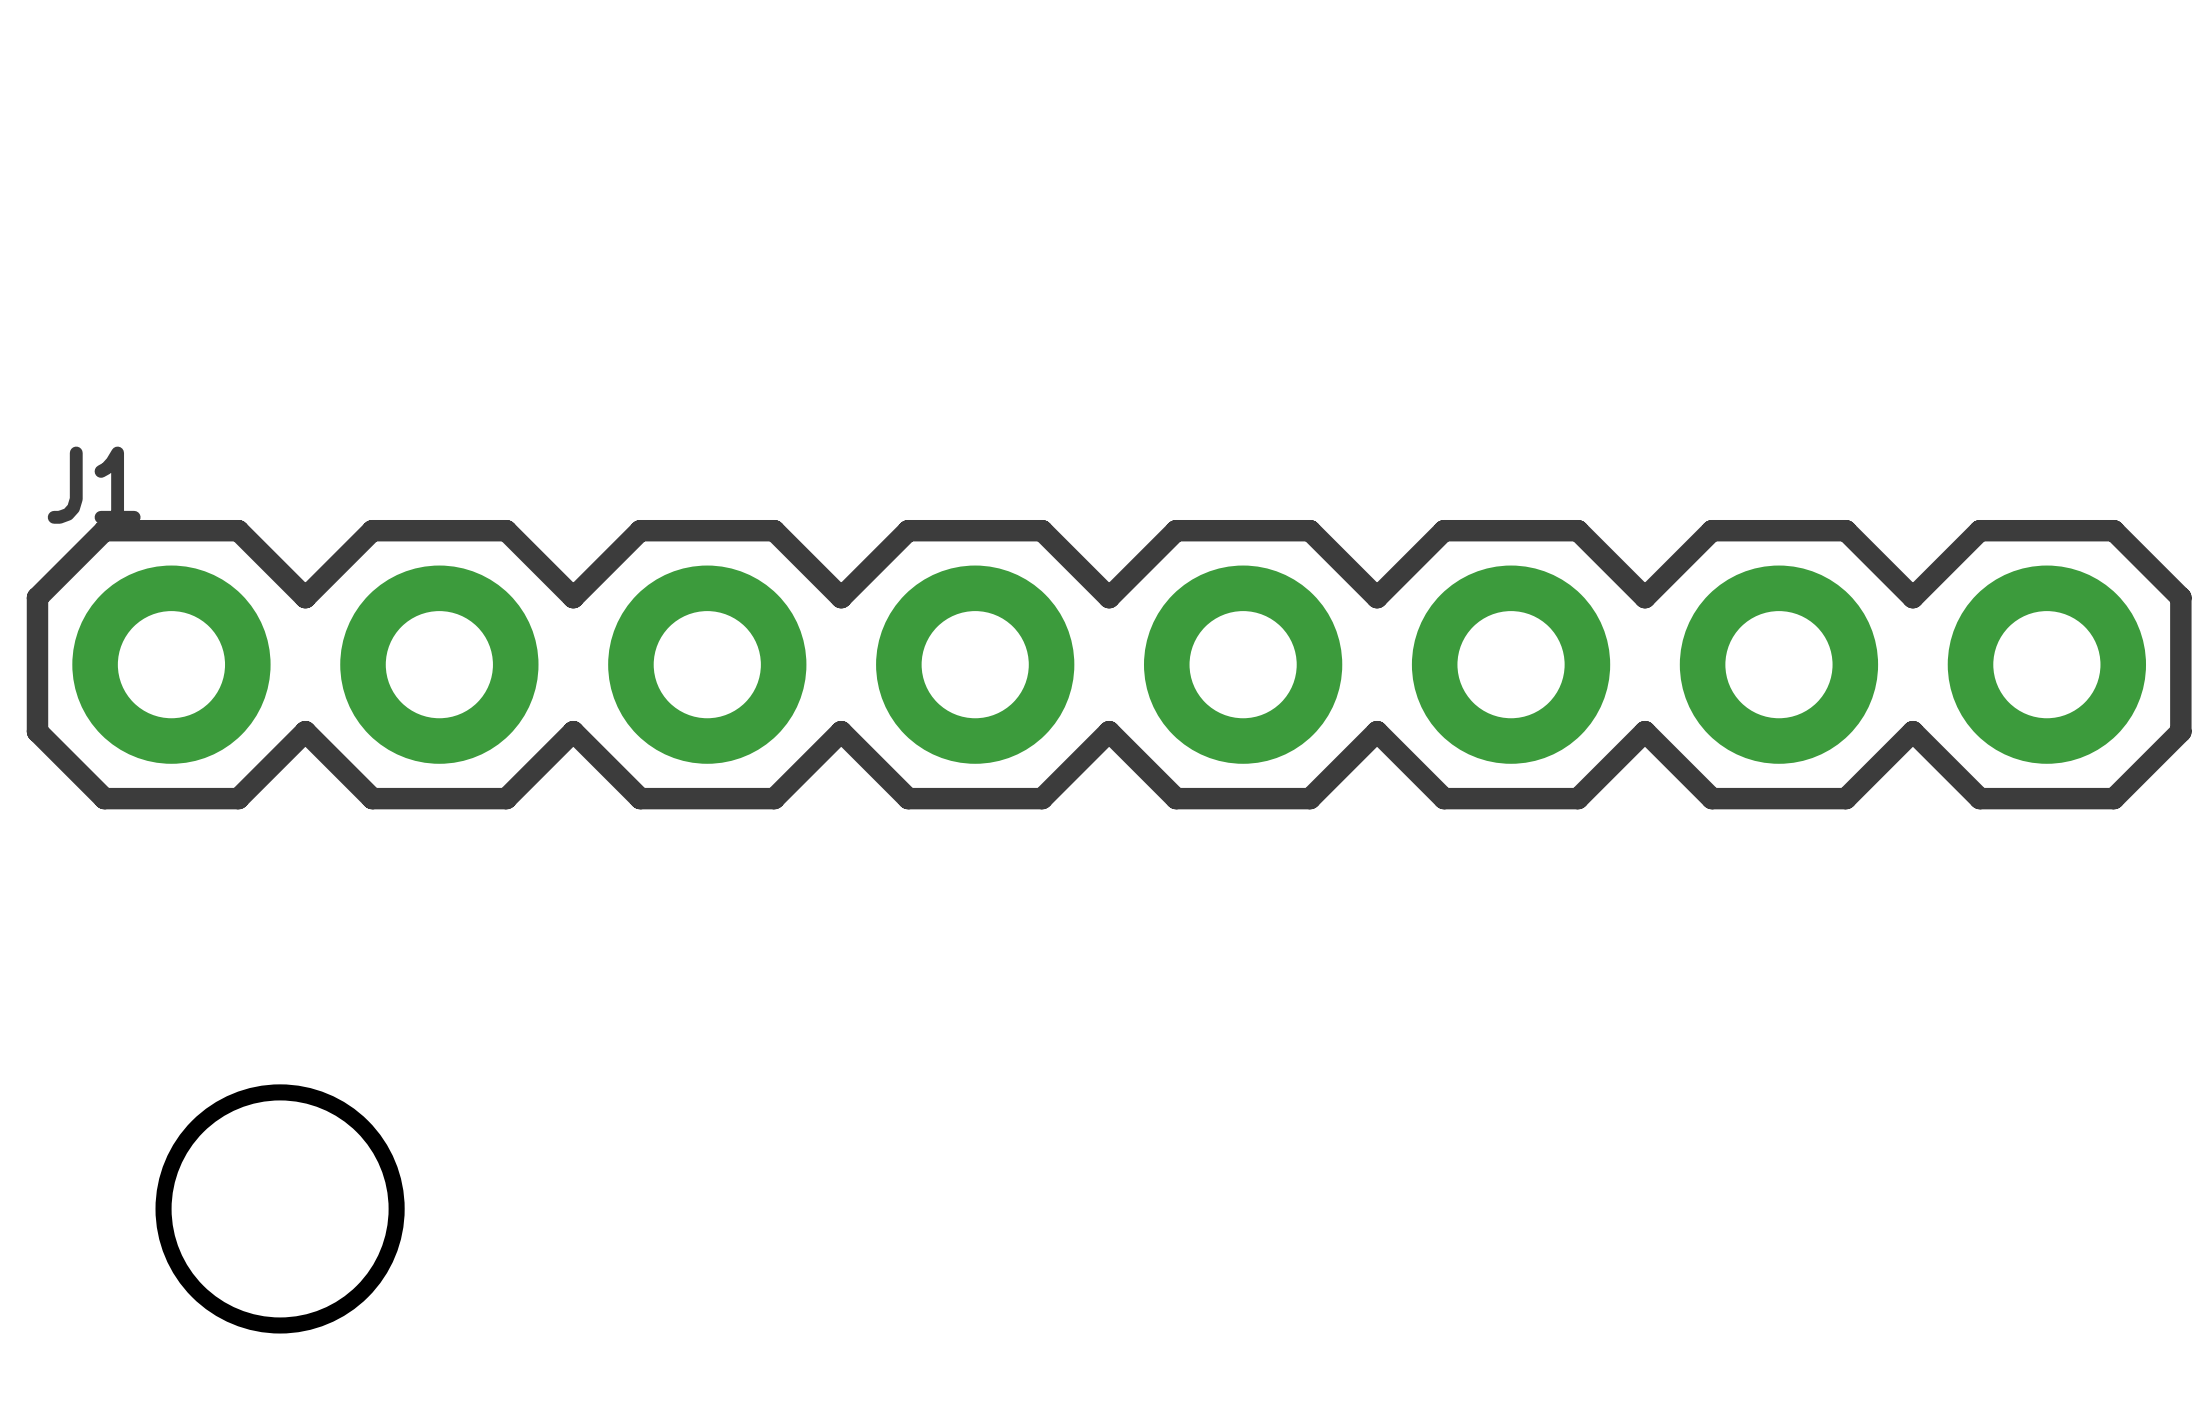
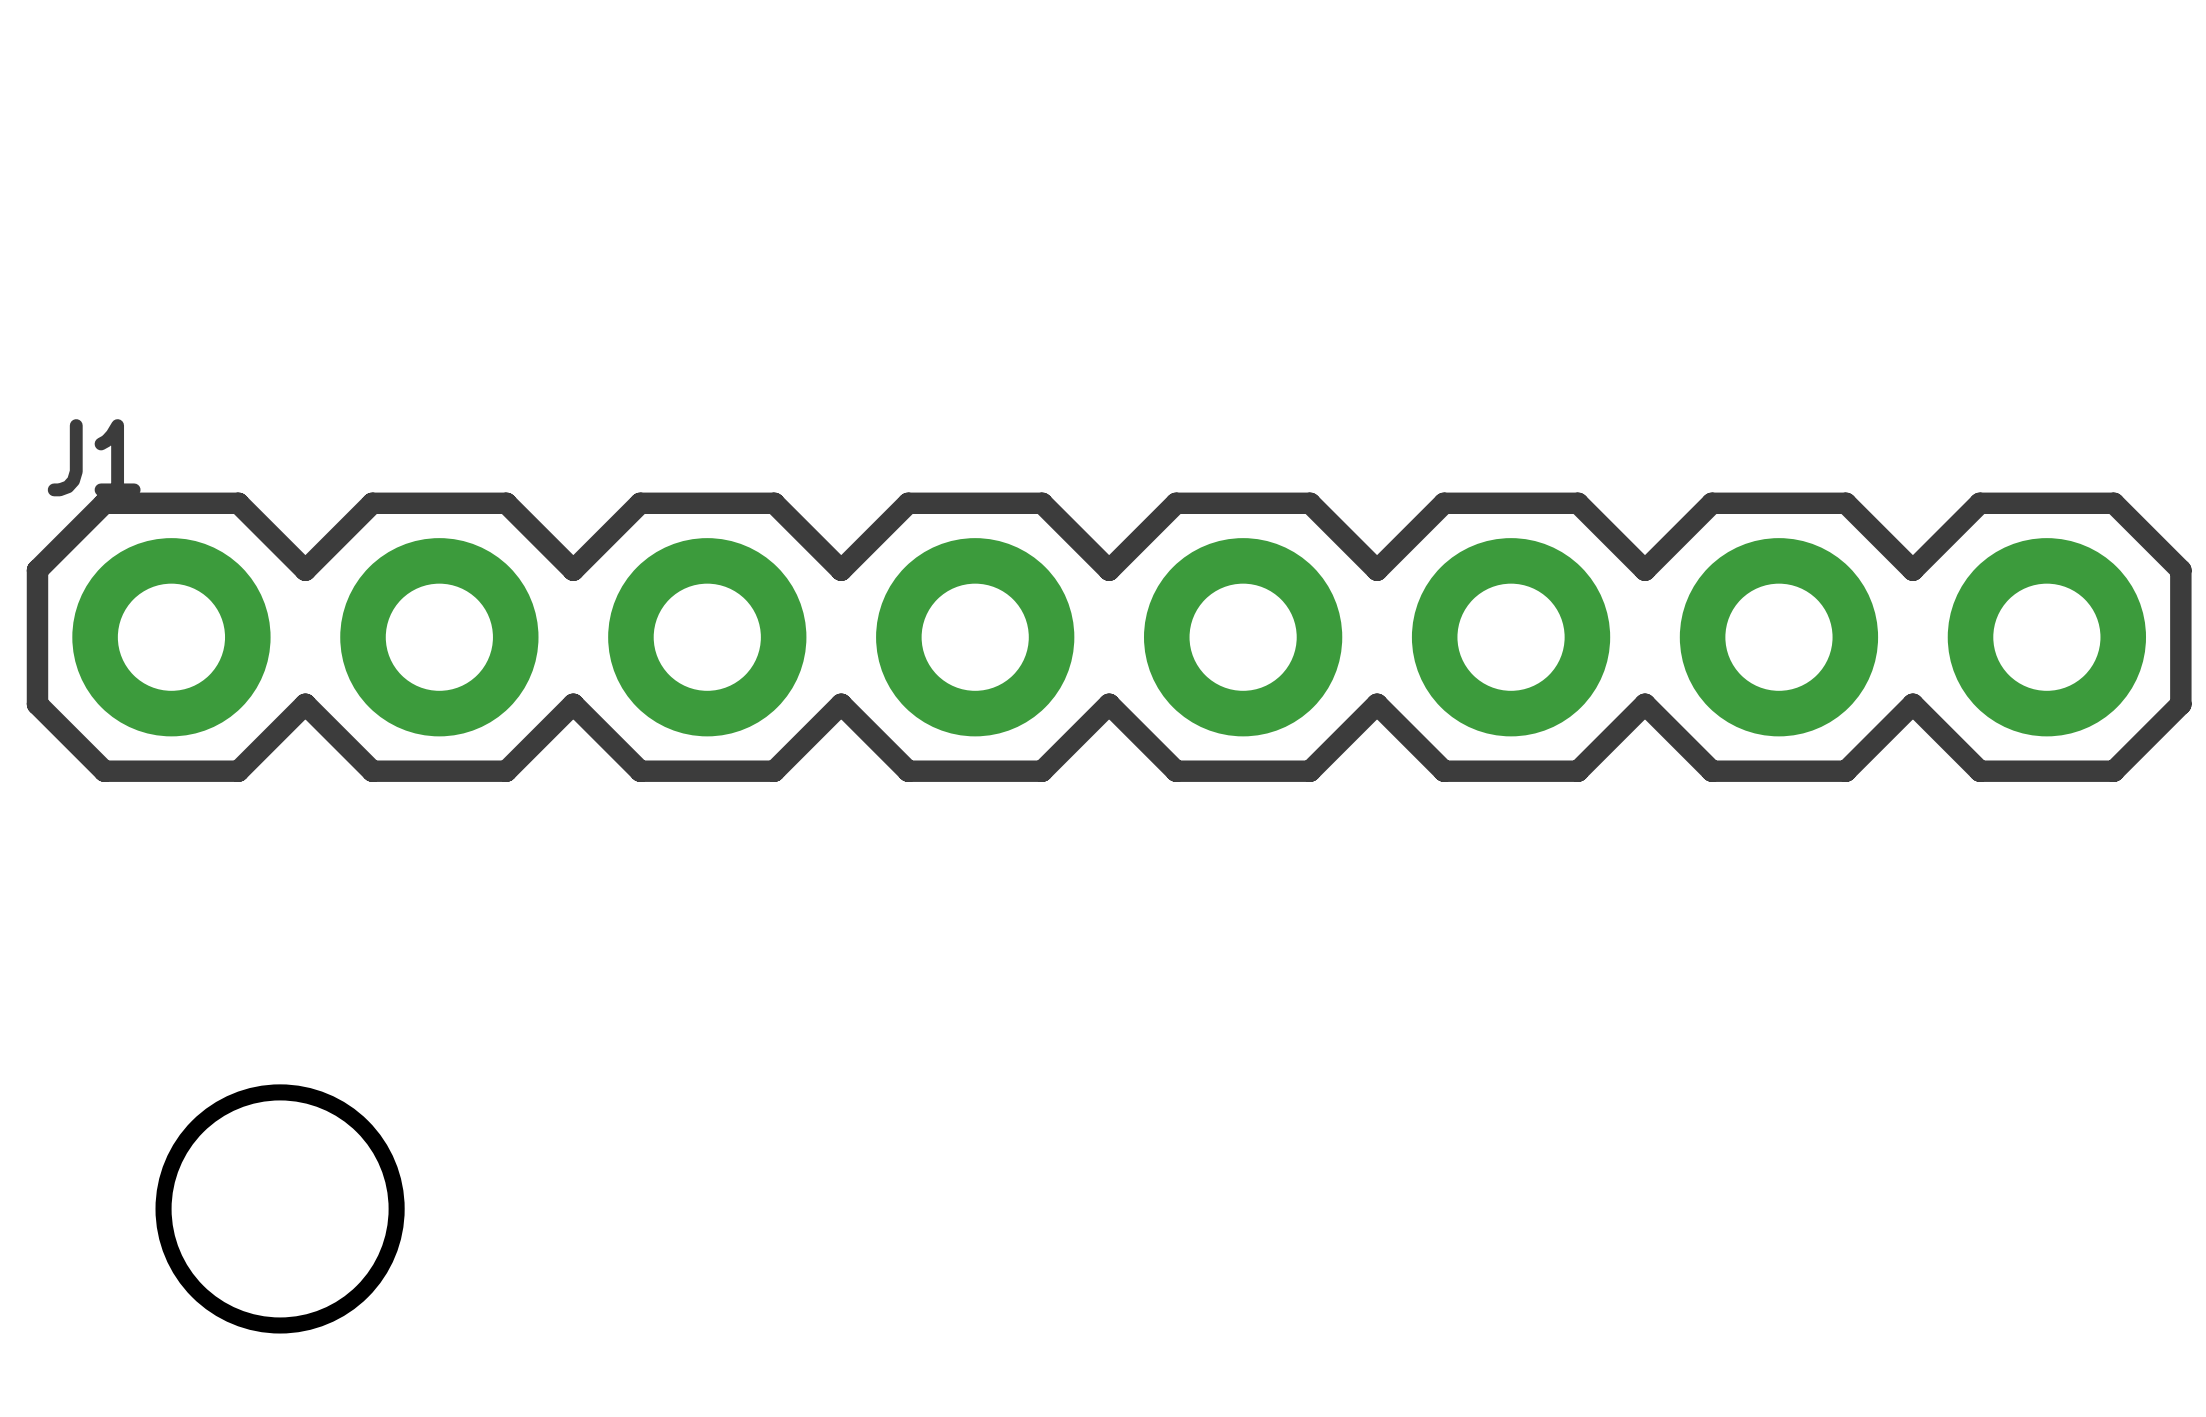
J1 position: (1109, 664) -> (1109, 637)

